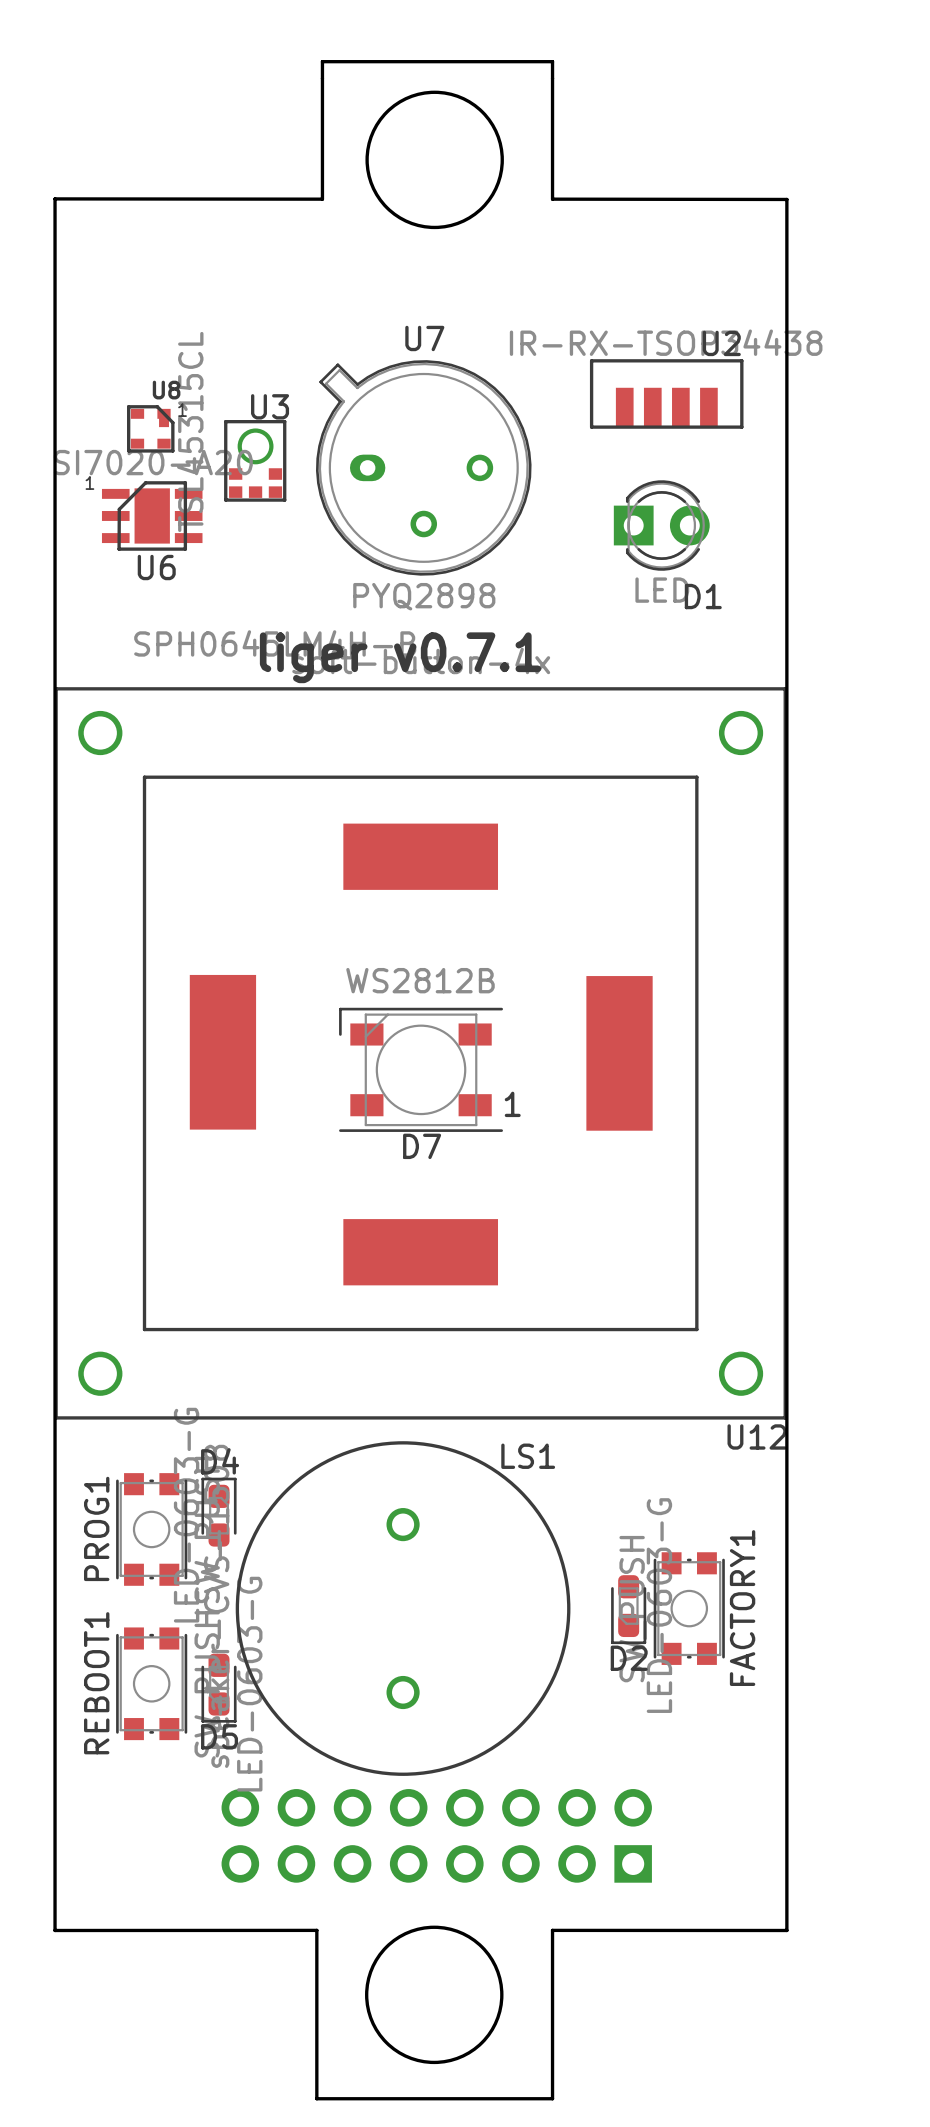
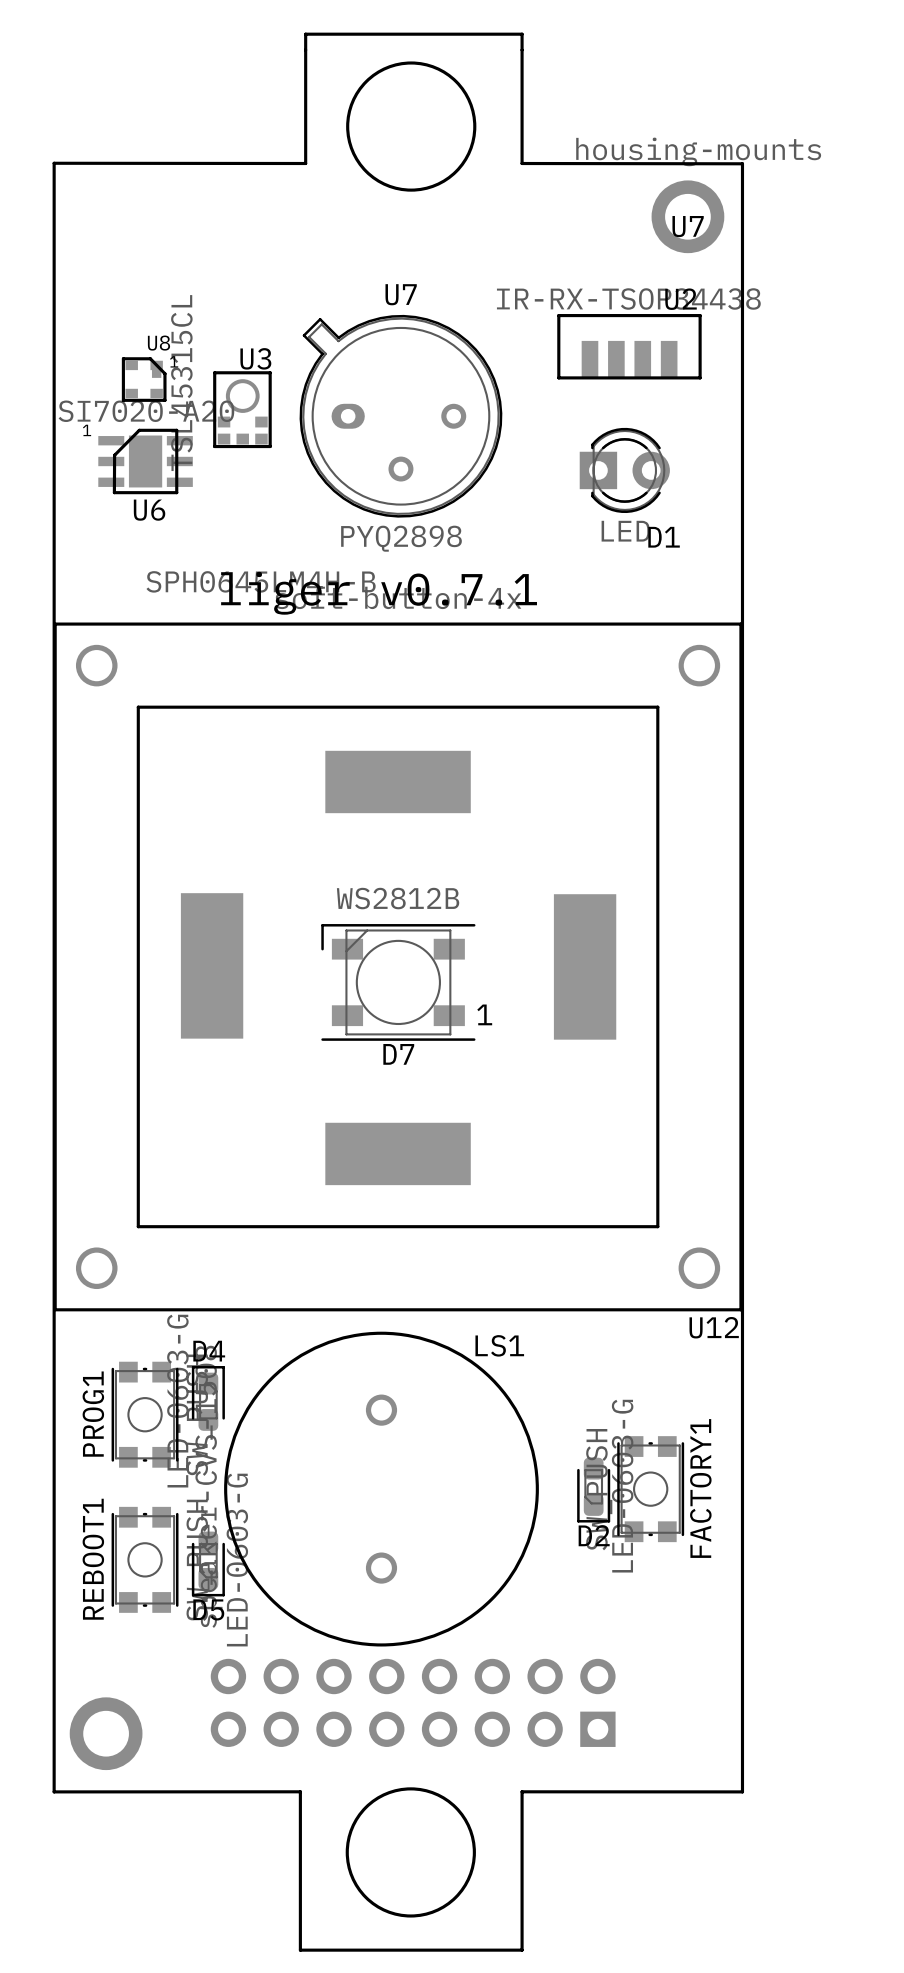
U7: none -> housing-mounts (397, 975)

